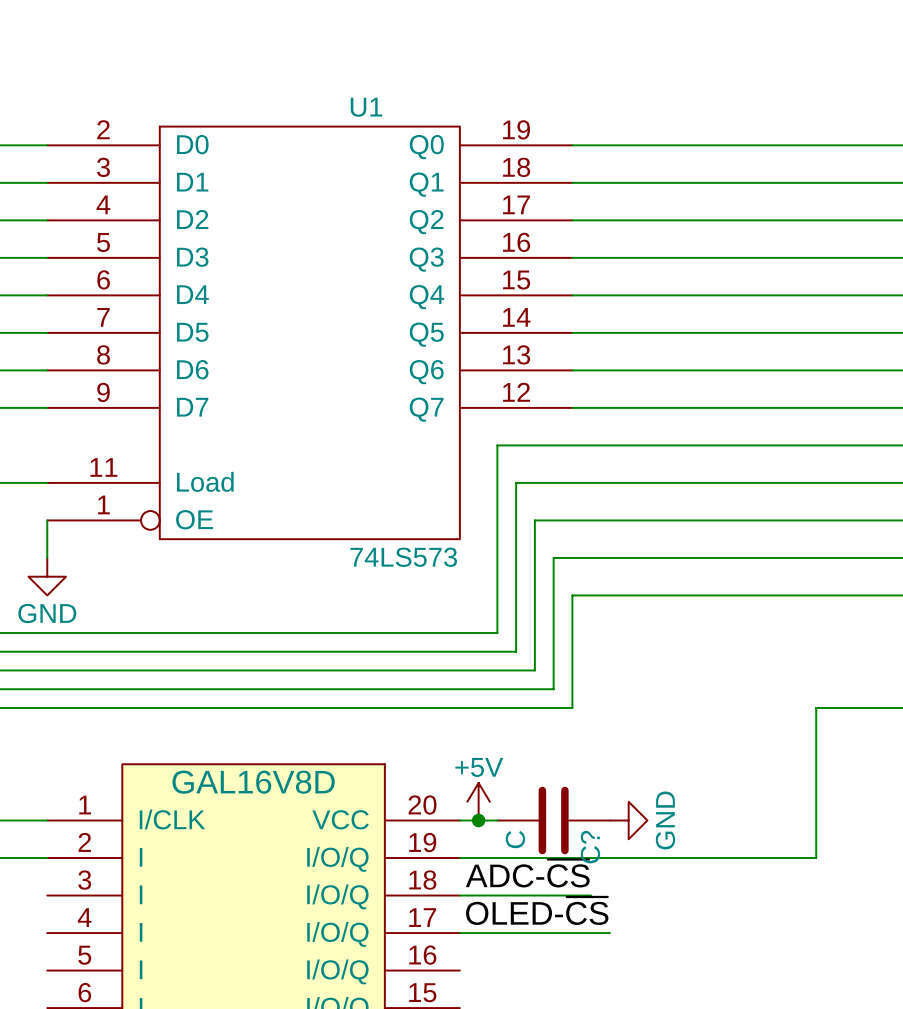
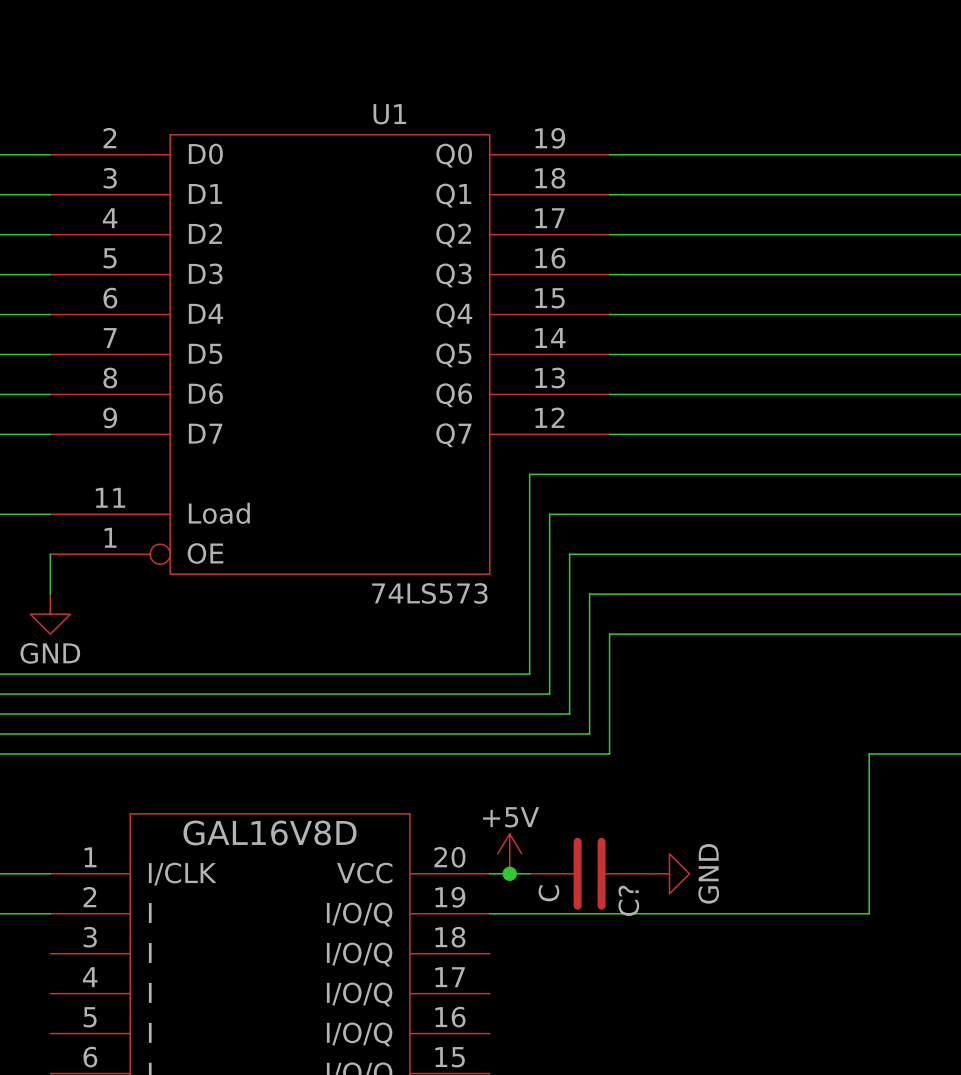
label: ADC-~{CS} (527, 873) -> none
wire: (459, 895) (591, 895) -> none
label: OLED-~{CS} (537, 910) -> none
wire: (459, 933) (609, 933) -> none

